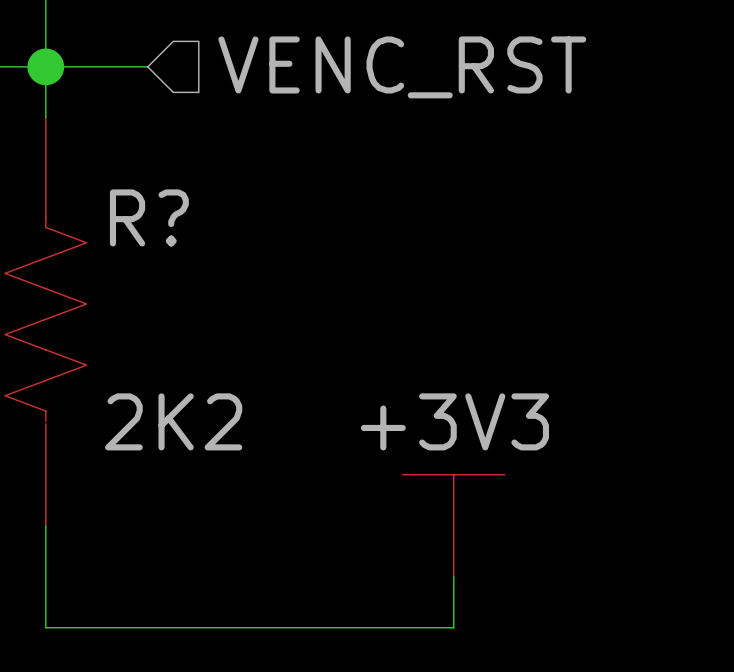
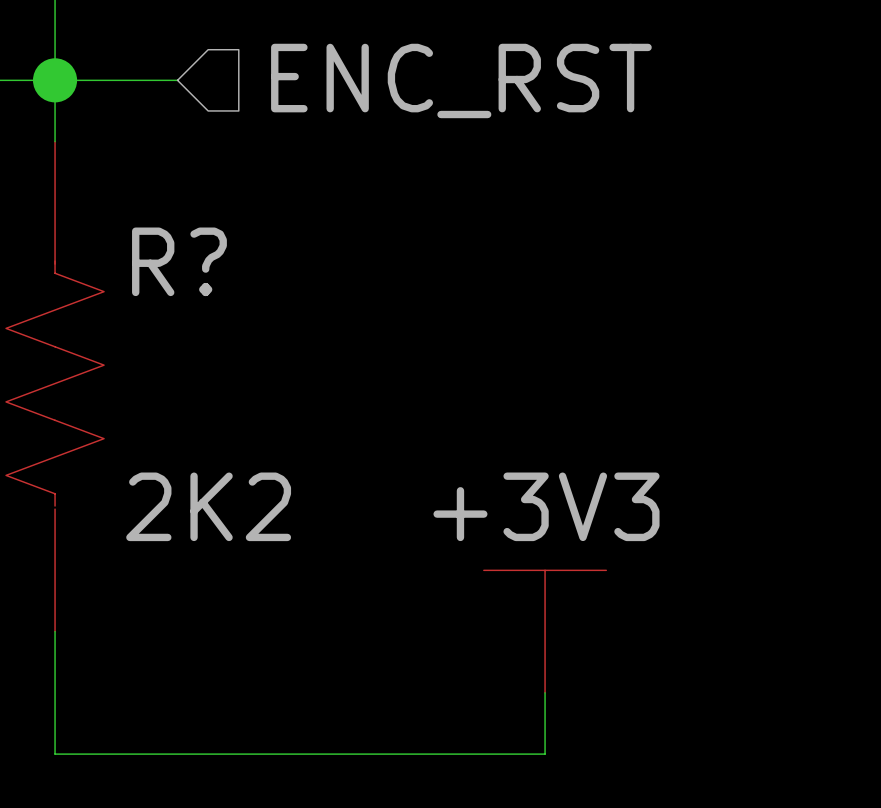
hierarchical label: VENC_RST (402, 67) -> ENC_RST (461, 80)

